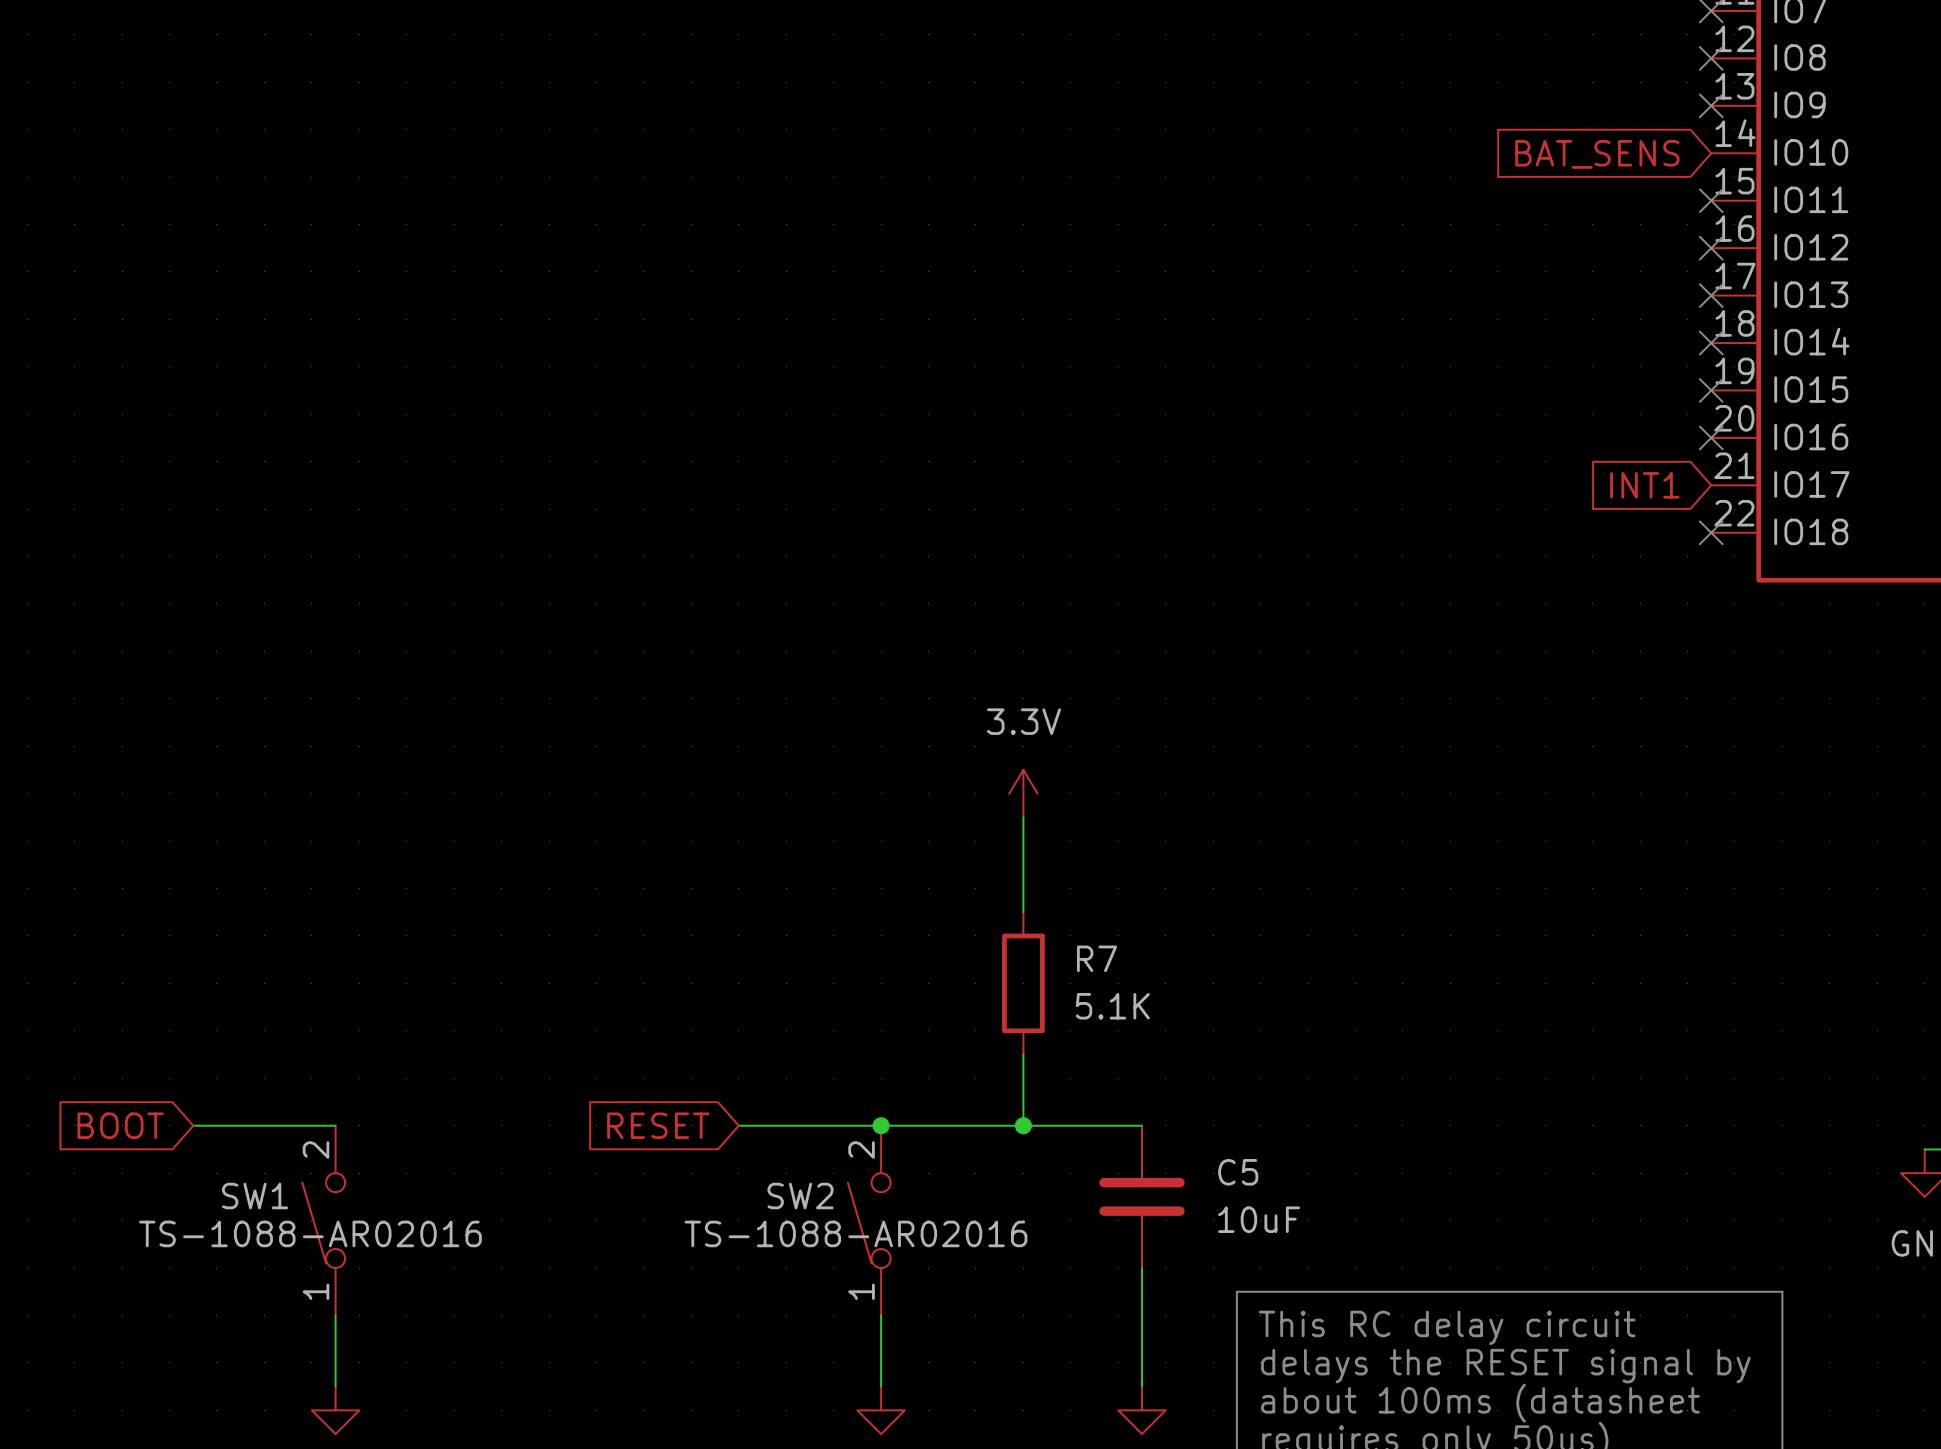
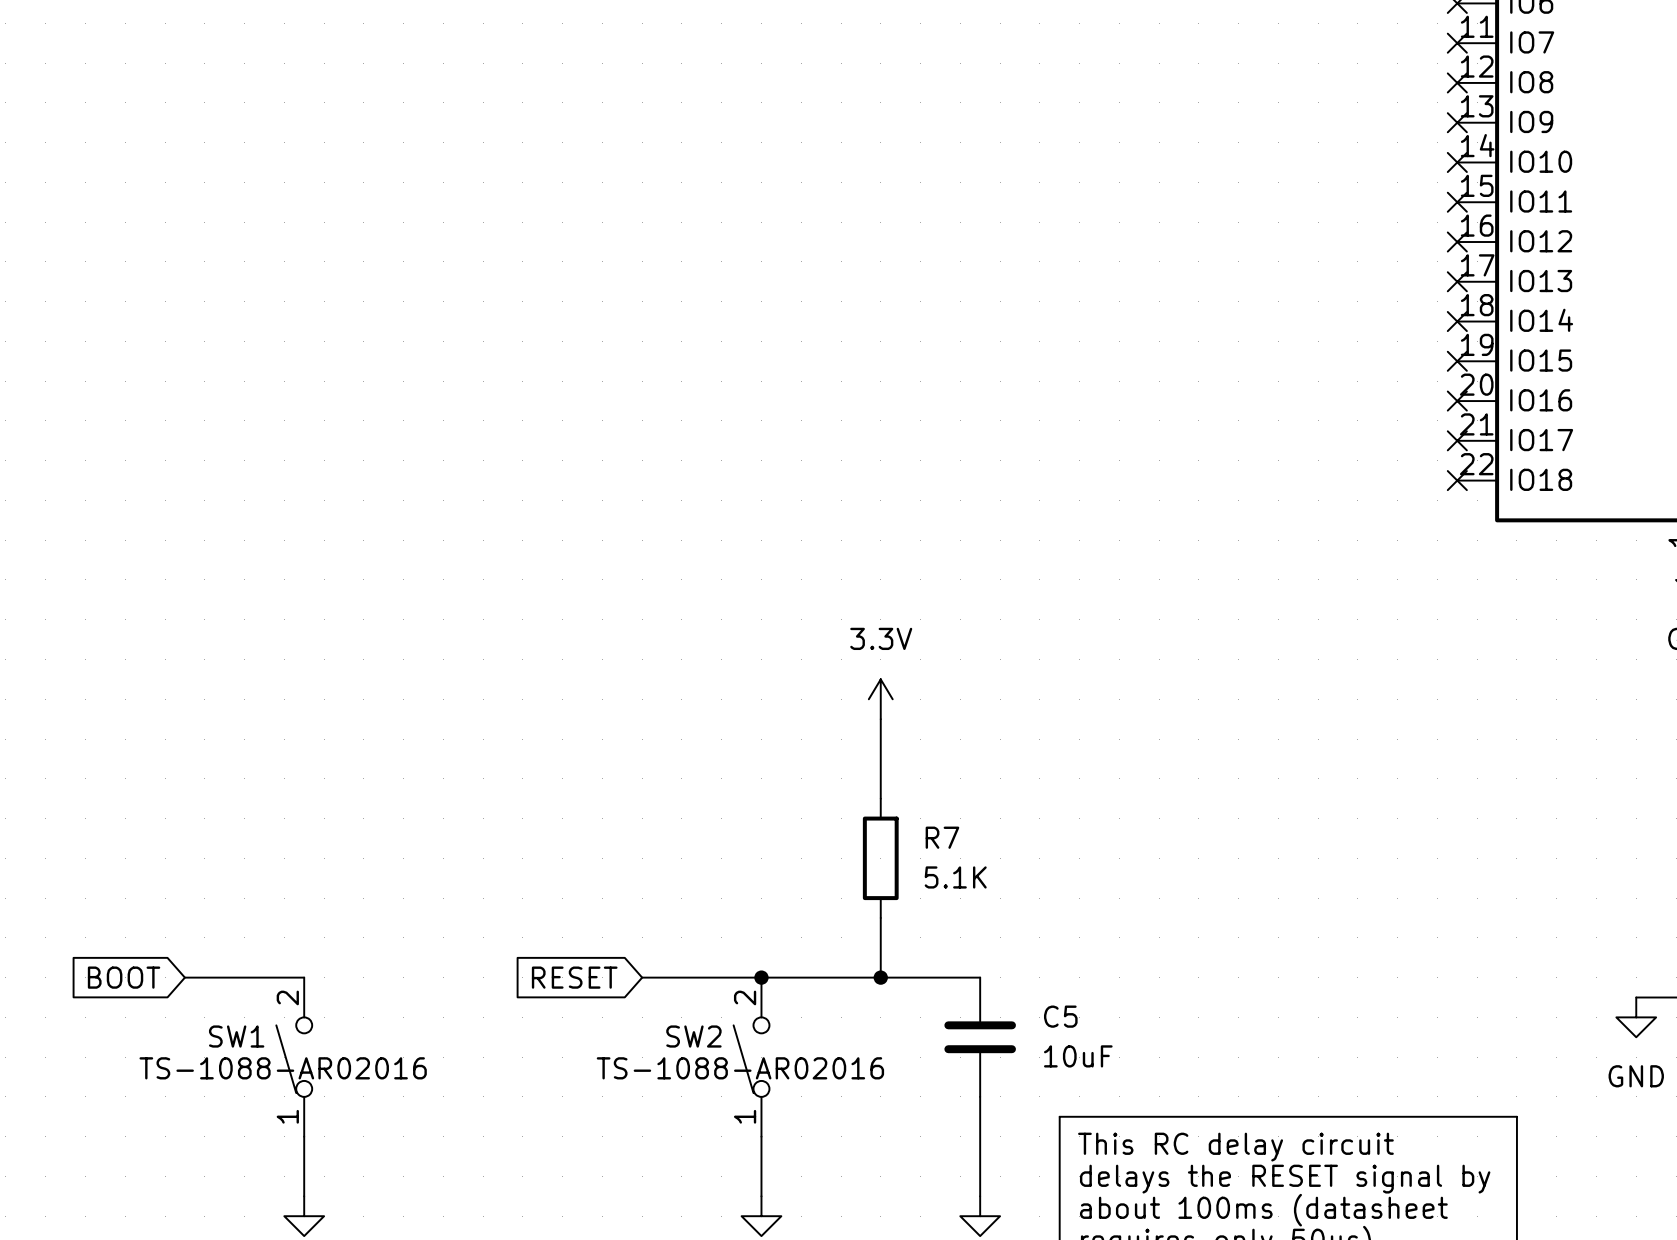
no-connect mark: none -> (1457, 162)
global label: BAT_SENS (1597, 154) -> none
global label: INT1 (1644, 485) -> none
no-connect mark: none -> (1457, 440)

